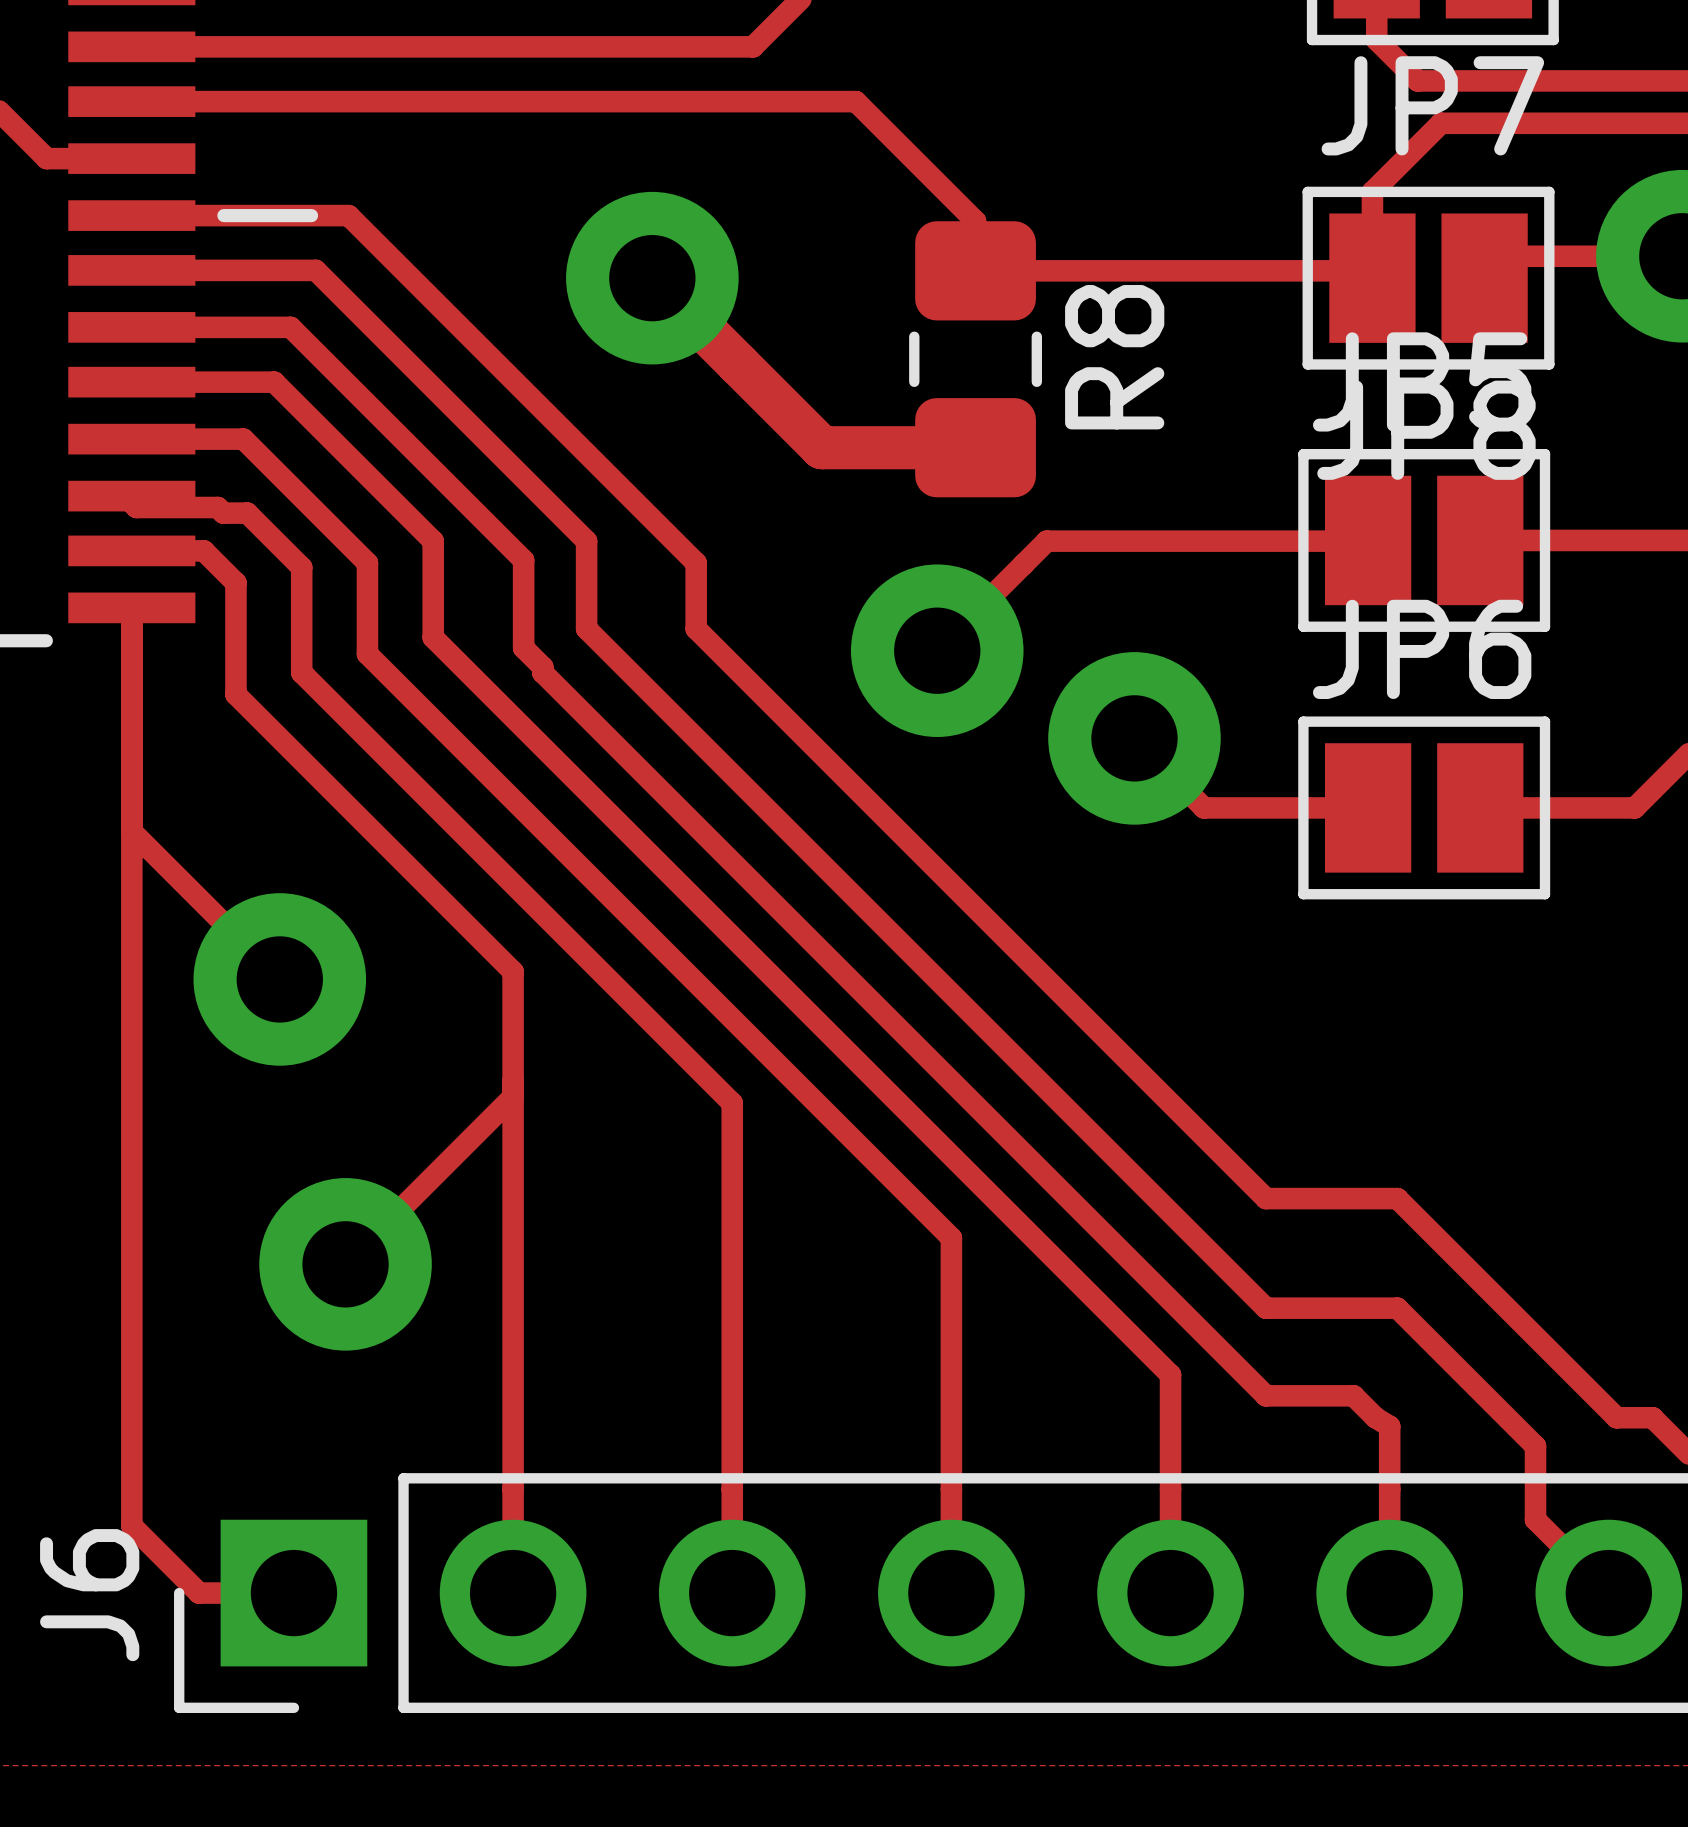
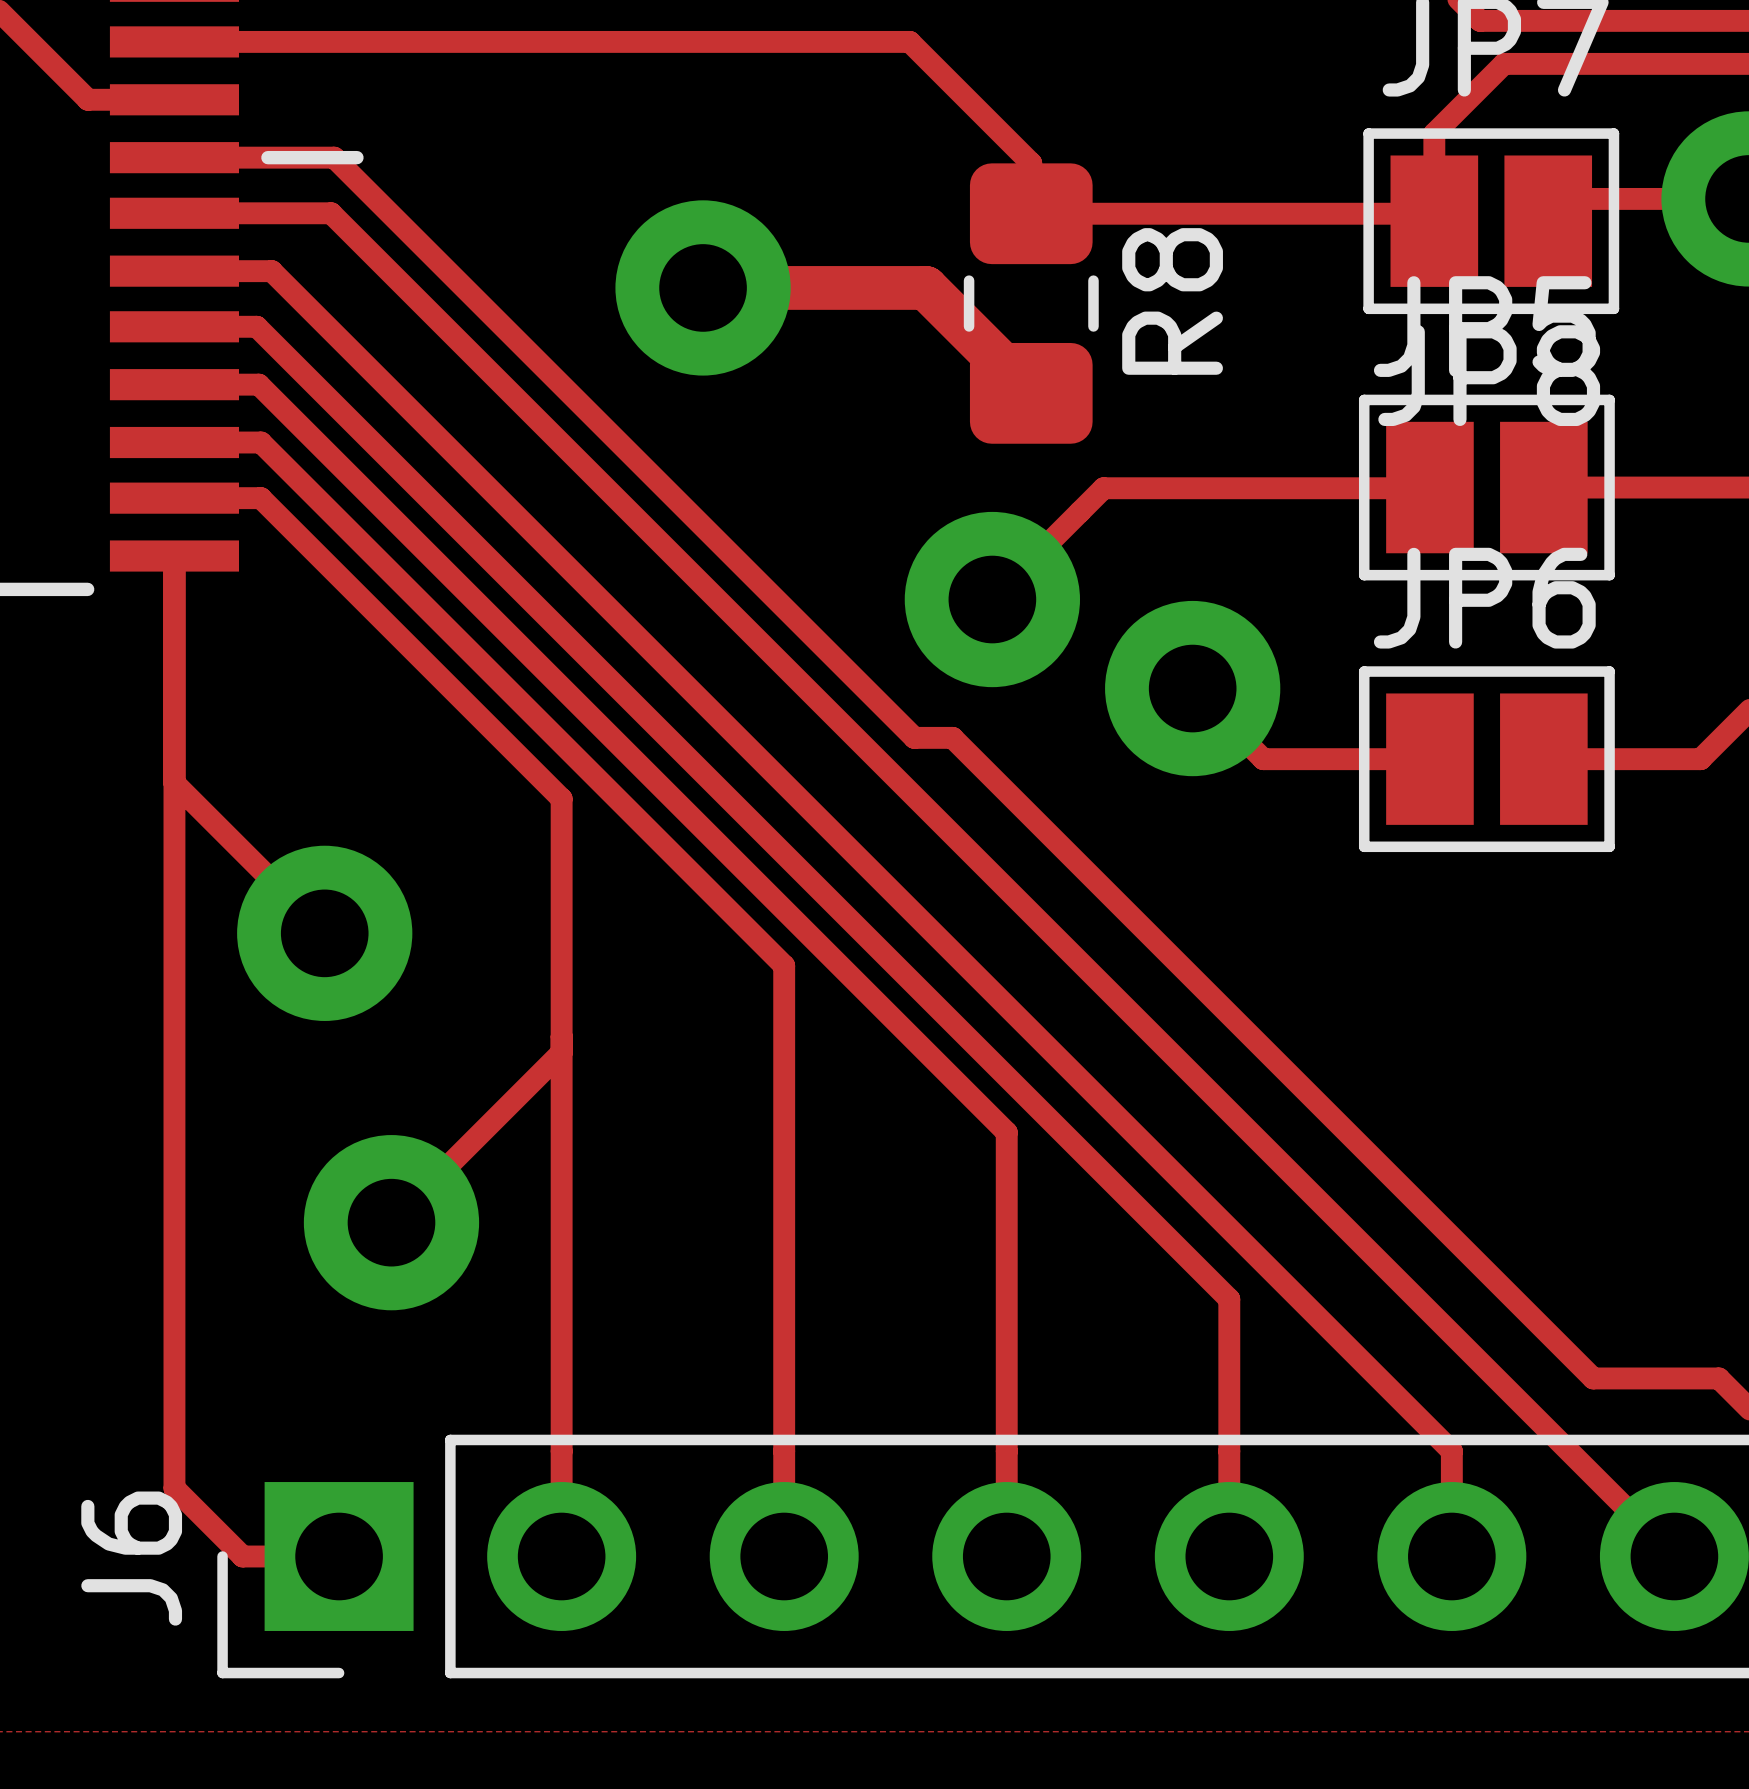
track: (289, 215) (348, 215) (696, 563) (696, 628) (1265, 1198) (1397, 1198) (1616, 1417) -> (334, 157) (914, 737) (952, 737) (1593, 1378) (1682, 1378)
track: (286, 270) (315, 270) (586, 541) (586, 628) (1265, 1308) (1397, 1308) (1535, 1446) (1535, 1519) -> (331, 213) (1599, 1482)
track: (652, 278) (821, 447) (975, 447) -> (703, 287) (925, 287) (1031, 393)
via position: (652, 278) -> (703, 287)
track: (227, 327) (290, 327) (523, 560) (523, 647) (542, 667) (542, 672) (1265, 1395) (1353, 1395) (1375, 1417) (1389, 1426) (1389, 1489) -> (271, 271) (1451, 1451)
track: (212, 382) (274, 382) (433, 541) (433, 637) (1170, 1374) -> (256, 326) (1229, 1299) (1229, 1334)
track: (215, 439) (243, 439) (367, 563) (367, 654) (951, 1237) -> (258, 384) (1006, 1132) (1006, 1195)
track: (131, 496) (131, 502) (136, 507) (217, 507) (223, 513) (247, 513) (301, 567) (301, 672) (732, 1103) -> (174, 442) (261, 442) (784, 965) (784, 1059)
track: (203, 550) (235, 582) (235, 694) (513, 971) -> (247, 498) (260, 498) (561, 798) (561, 925)

